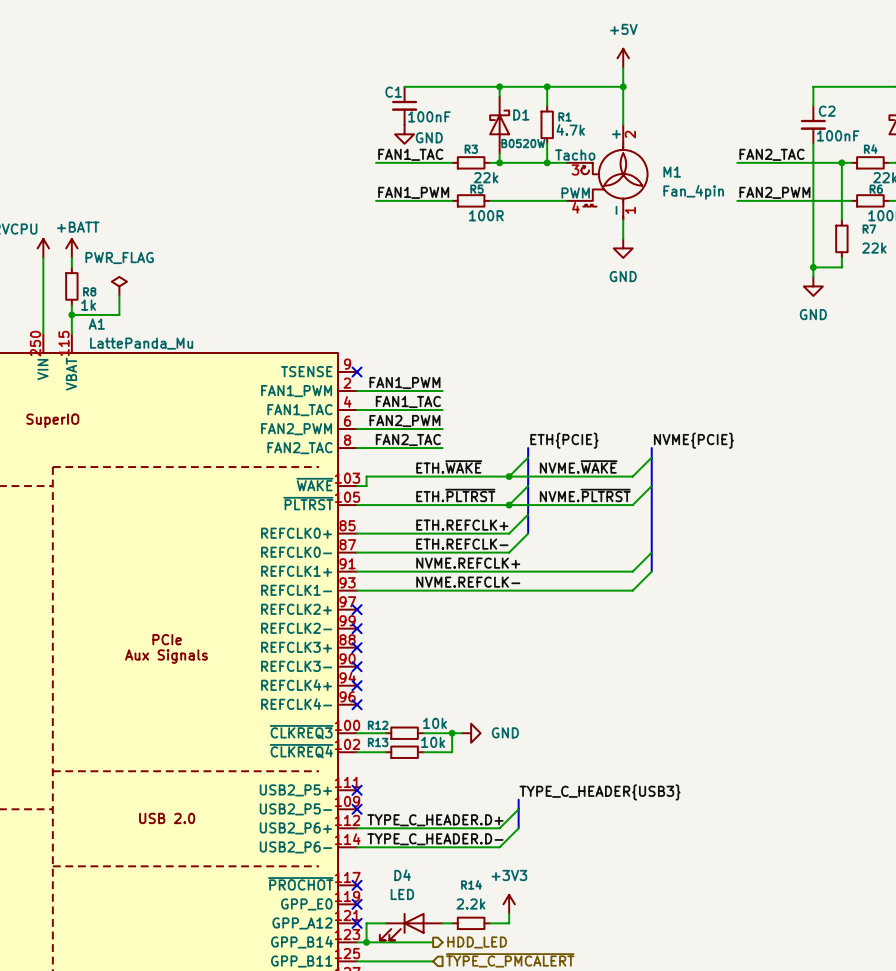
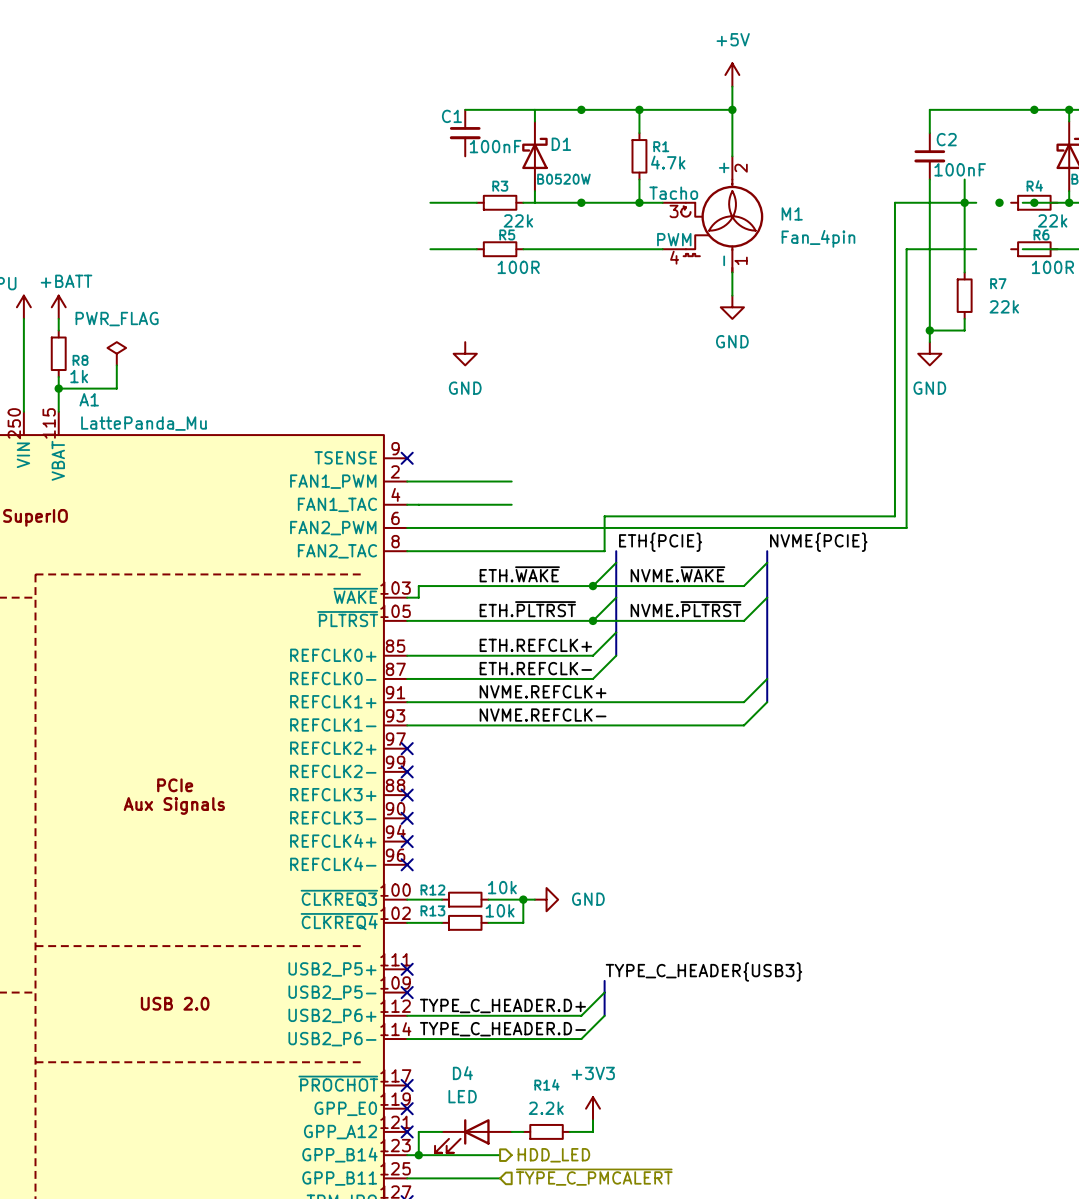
wire: (499, 86) (499, 96) -> (534, 109) (534, 121)
wire: (813, 86) (813, 105) -> (964, 109) (929, 109) (929, 133)
junction: none -> (1034, 109)
D1 position: (499, 124) -> (534, 156)
C2 position: (813, 124) -> (929, 156)
power symbol position: GND (404, 134) -> GND (465, 353)
power symbol text position: GND (429, 137) -> GND (465, 388)
wire: none -> (929, 179) (929, 342)
wire: (499, 153) (499, 162) -> (534, 191) (534, 202)
label: FAN1_TAC (410, 154) -> none
label: FAN2_TAC (772, 154) -> none
wire: (414, 162) (452, 162) -> (569, 202) (523, 202)
R3 position: (471, 162) -> (500, 202)
wire: (737, 162) (756, 162) -> (511, 551) (604, 551) (604, 516) (894, 516) (894, 202)
junction: none -> (964, 202)
wire: (822, 162) (851, 162) -> (1022, 202) (1057, 202)
wire: (841, 162) (841, 219) -> none
junction: none -> (1034, 202)
label: FAN1_PWM (413, 192) -> none
label: FAN2_PWM (774, 192) -> none
wire: (414, 200) (452, 200) -> (569, 249) (523, 249)
R5 position: (471, 200) -> (500, 249)
wire: (737, 200) (765, 200) -> (511, 527) (906, 527) (906, 249)
wire: (822, 200) (851, 200) -> (1022, 249) (1057, 249)
wire: (813, 219) (813, 257) -> none
R7 position: (841, 238) -> (964, 295)
wire: (841, 257) (841, 267) (813, 267) (813, 276) -> none
wire: none -> (929, 330) (964, 330)
junction position: (813, 267) -> (929, 330)
power symbol position: GND (813, 286) -> GND (929, 353)
label: FAN1_PWM (404, 382) -> none
label: FAN1_TAC (408, 401) -> none
label: FAN2_PWM (404, 421) -> none
label: FAN2_TAC (408, 440) -> none

